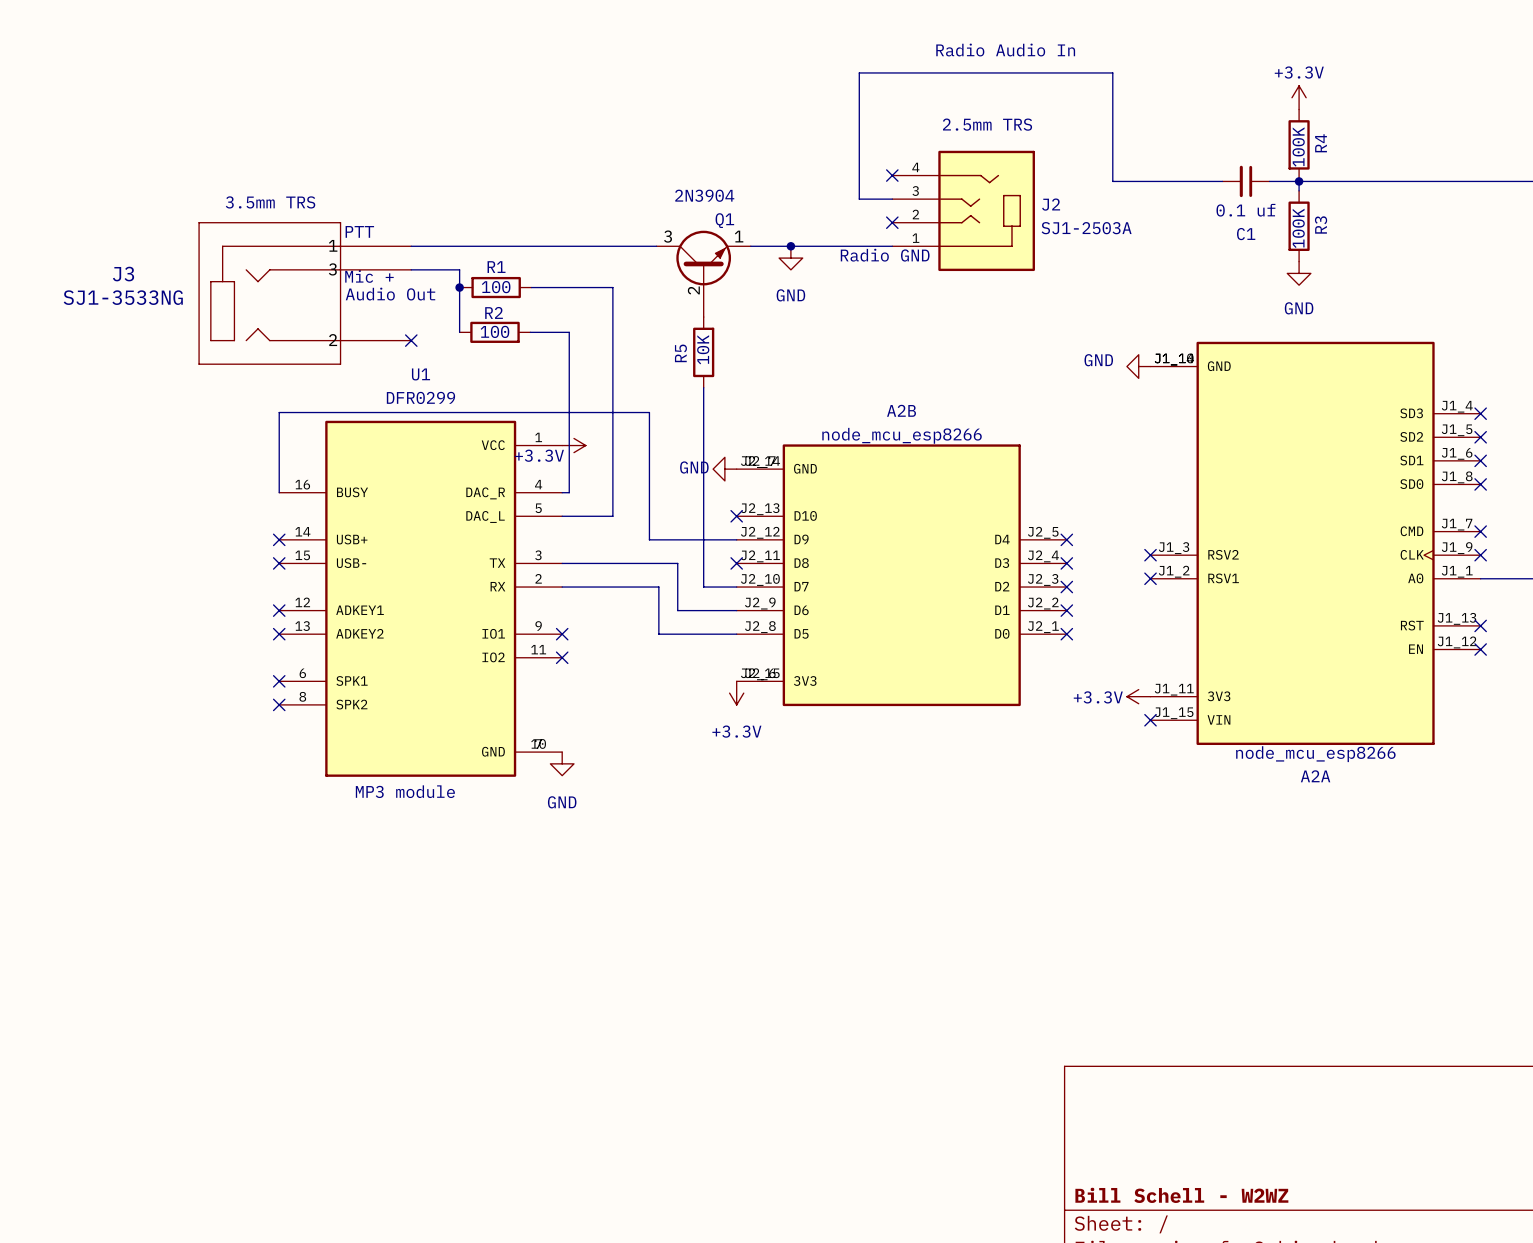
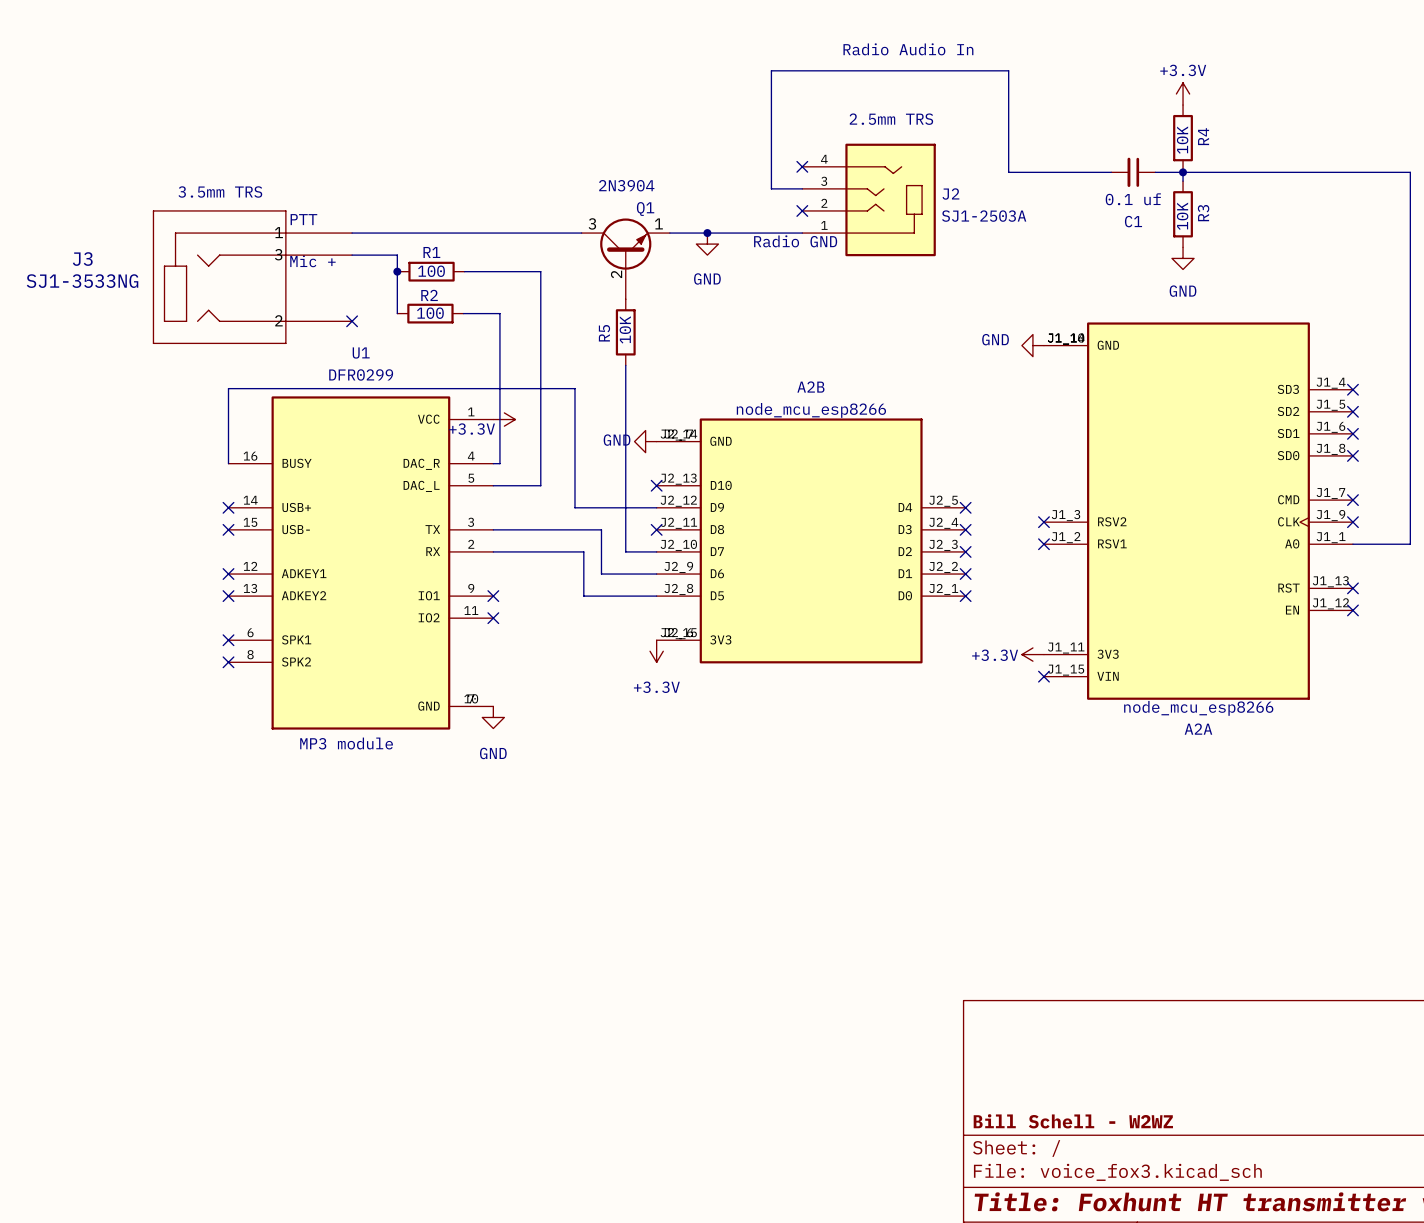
R4 value: 100K (1298, 146) -> 10K (1182, 140)
R3 value: 100K (1298, 228) -> 10K (1182, 216)
text: Audio Out (390, 294) -> none

